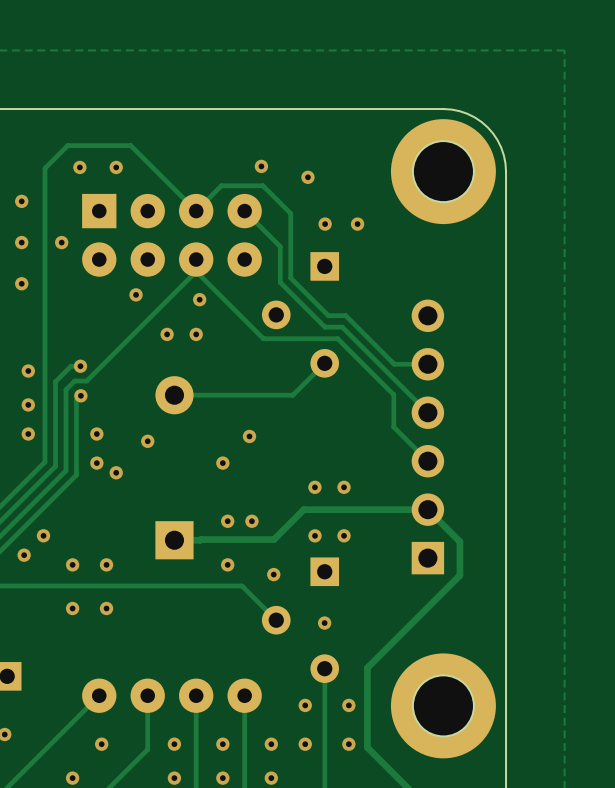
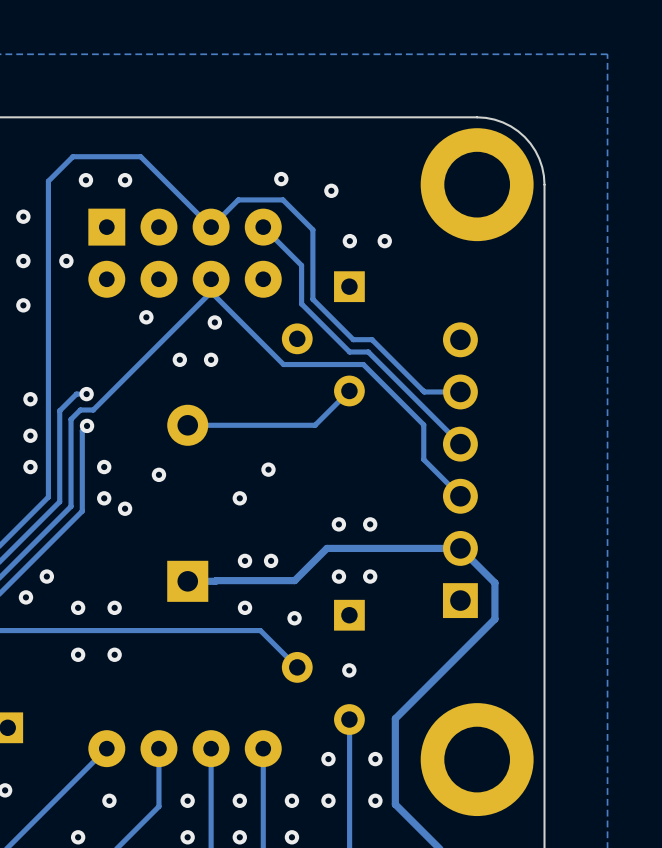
round board edge: [411, 140, 475, 204] -> none
round board edge: [411, 674, 475, 738] -> none

